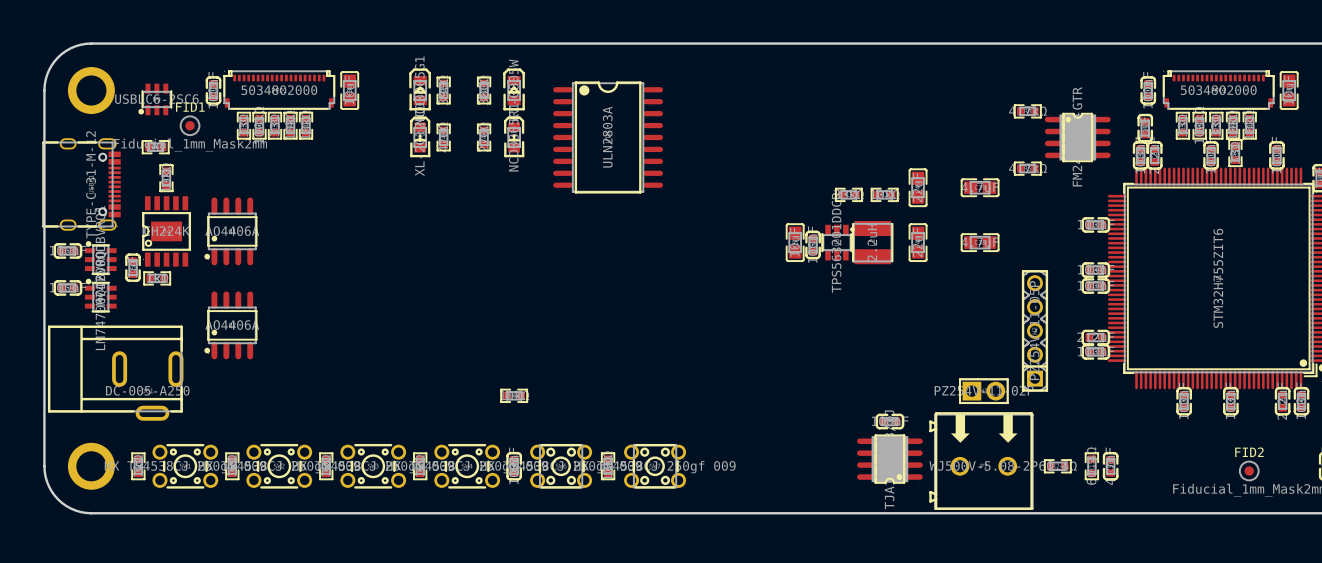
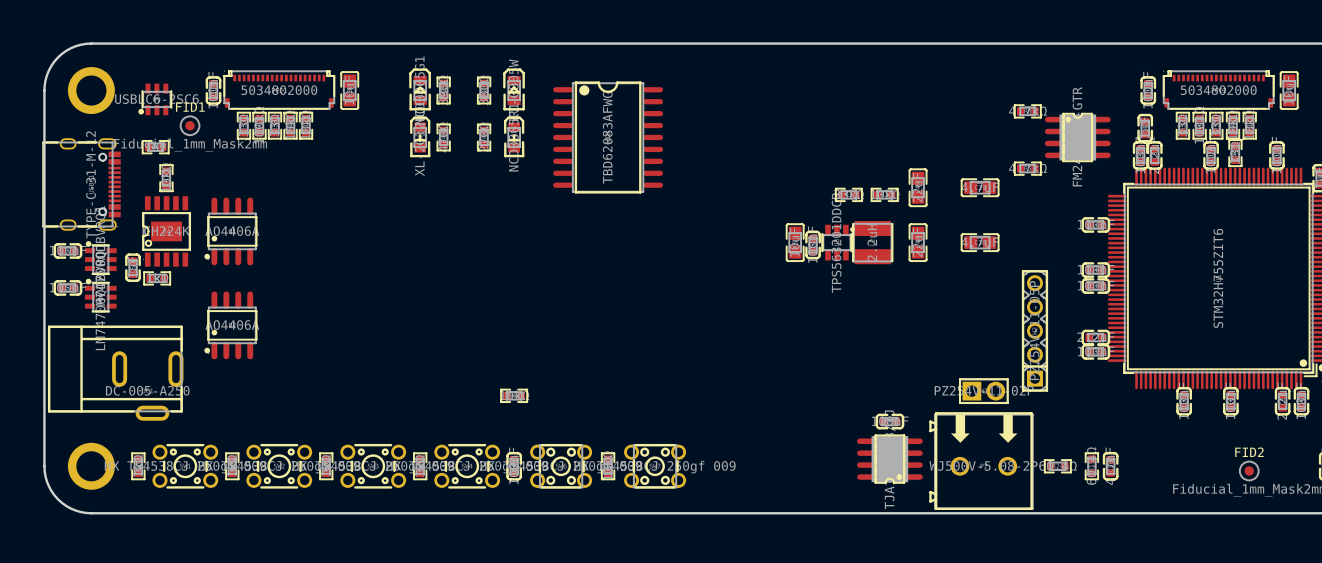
part value: ULN2803A (607, 137) -> TBD62083AFWG (607, 137)

